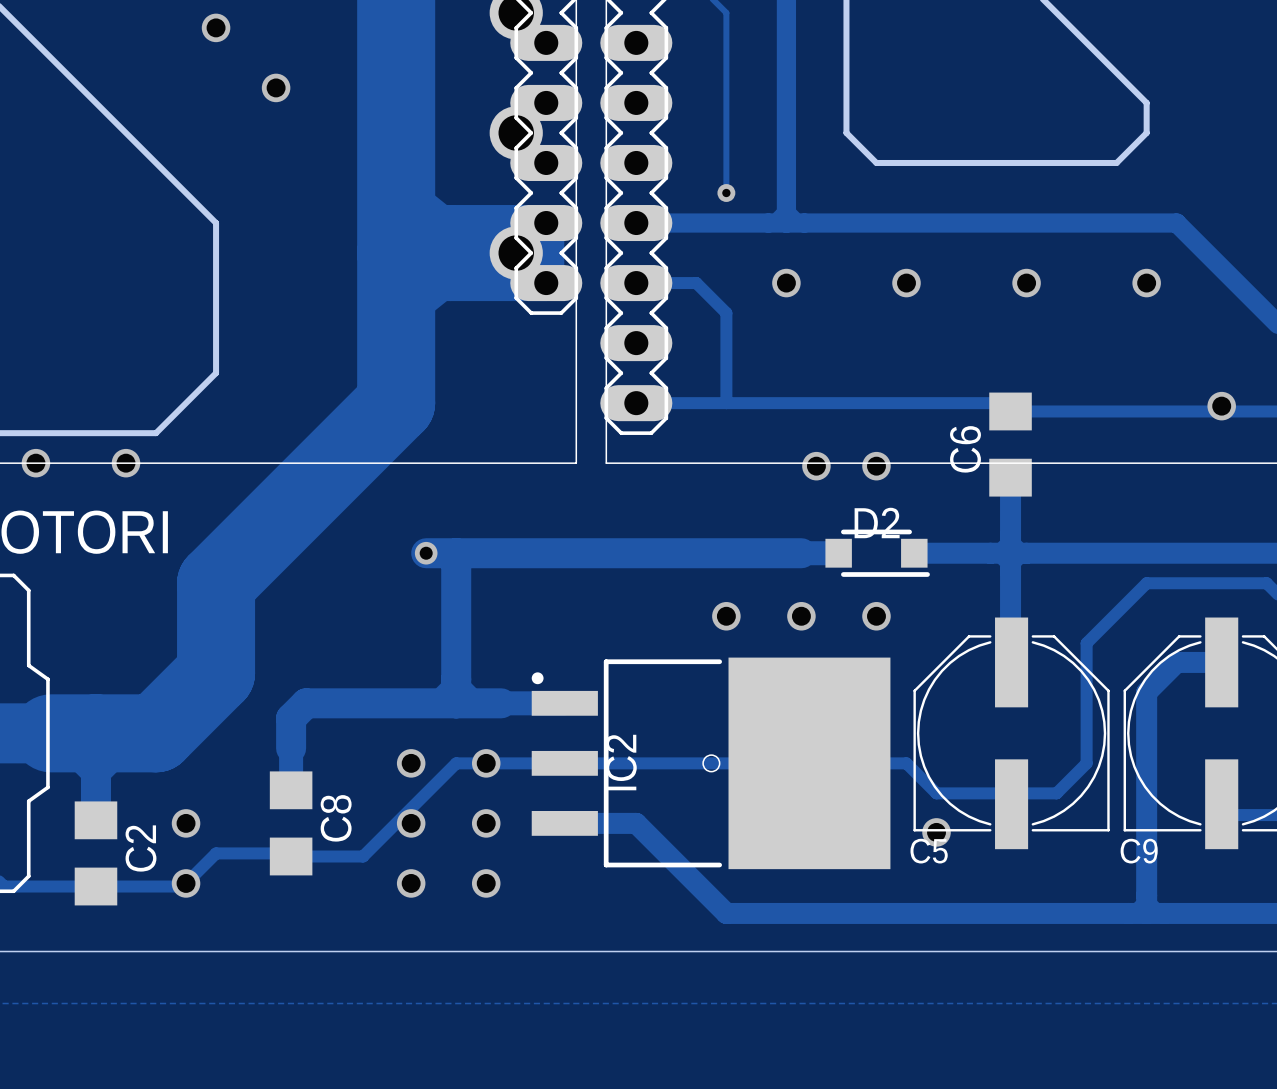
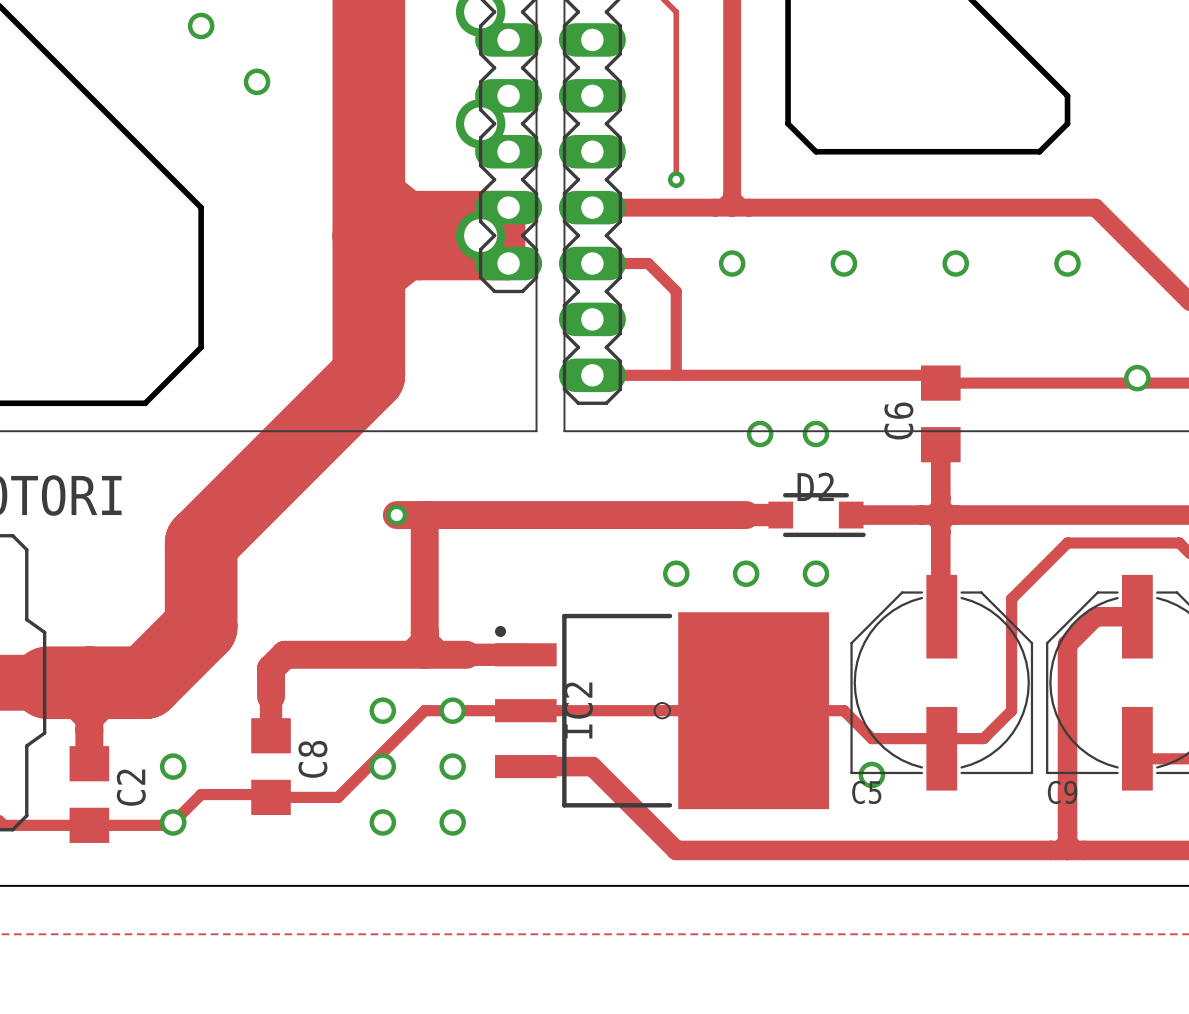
via: (35, 463) -> none
via: (126, 463) -> none

